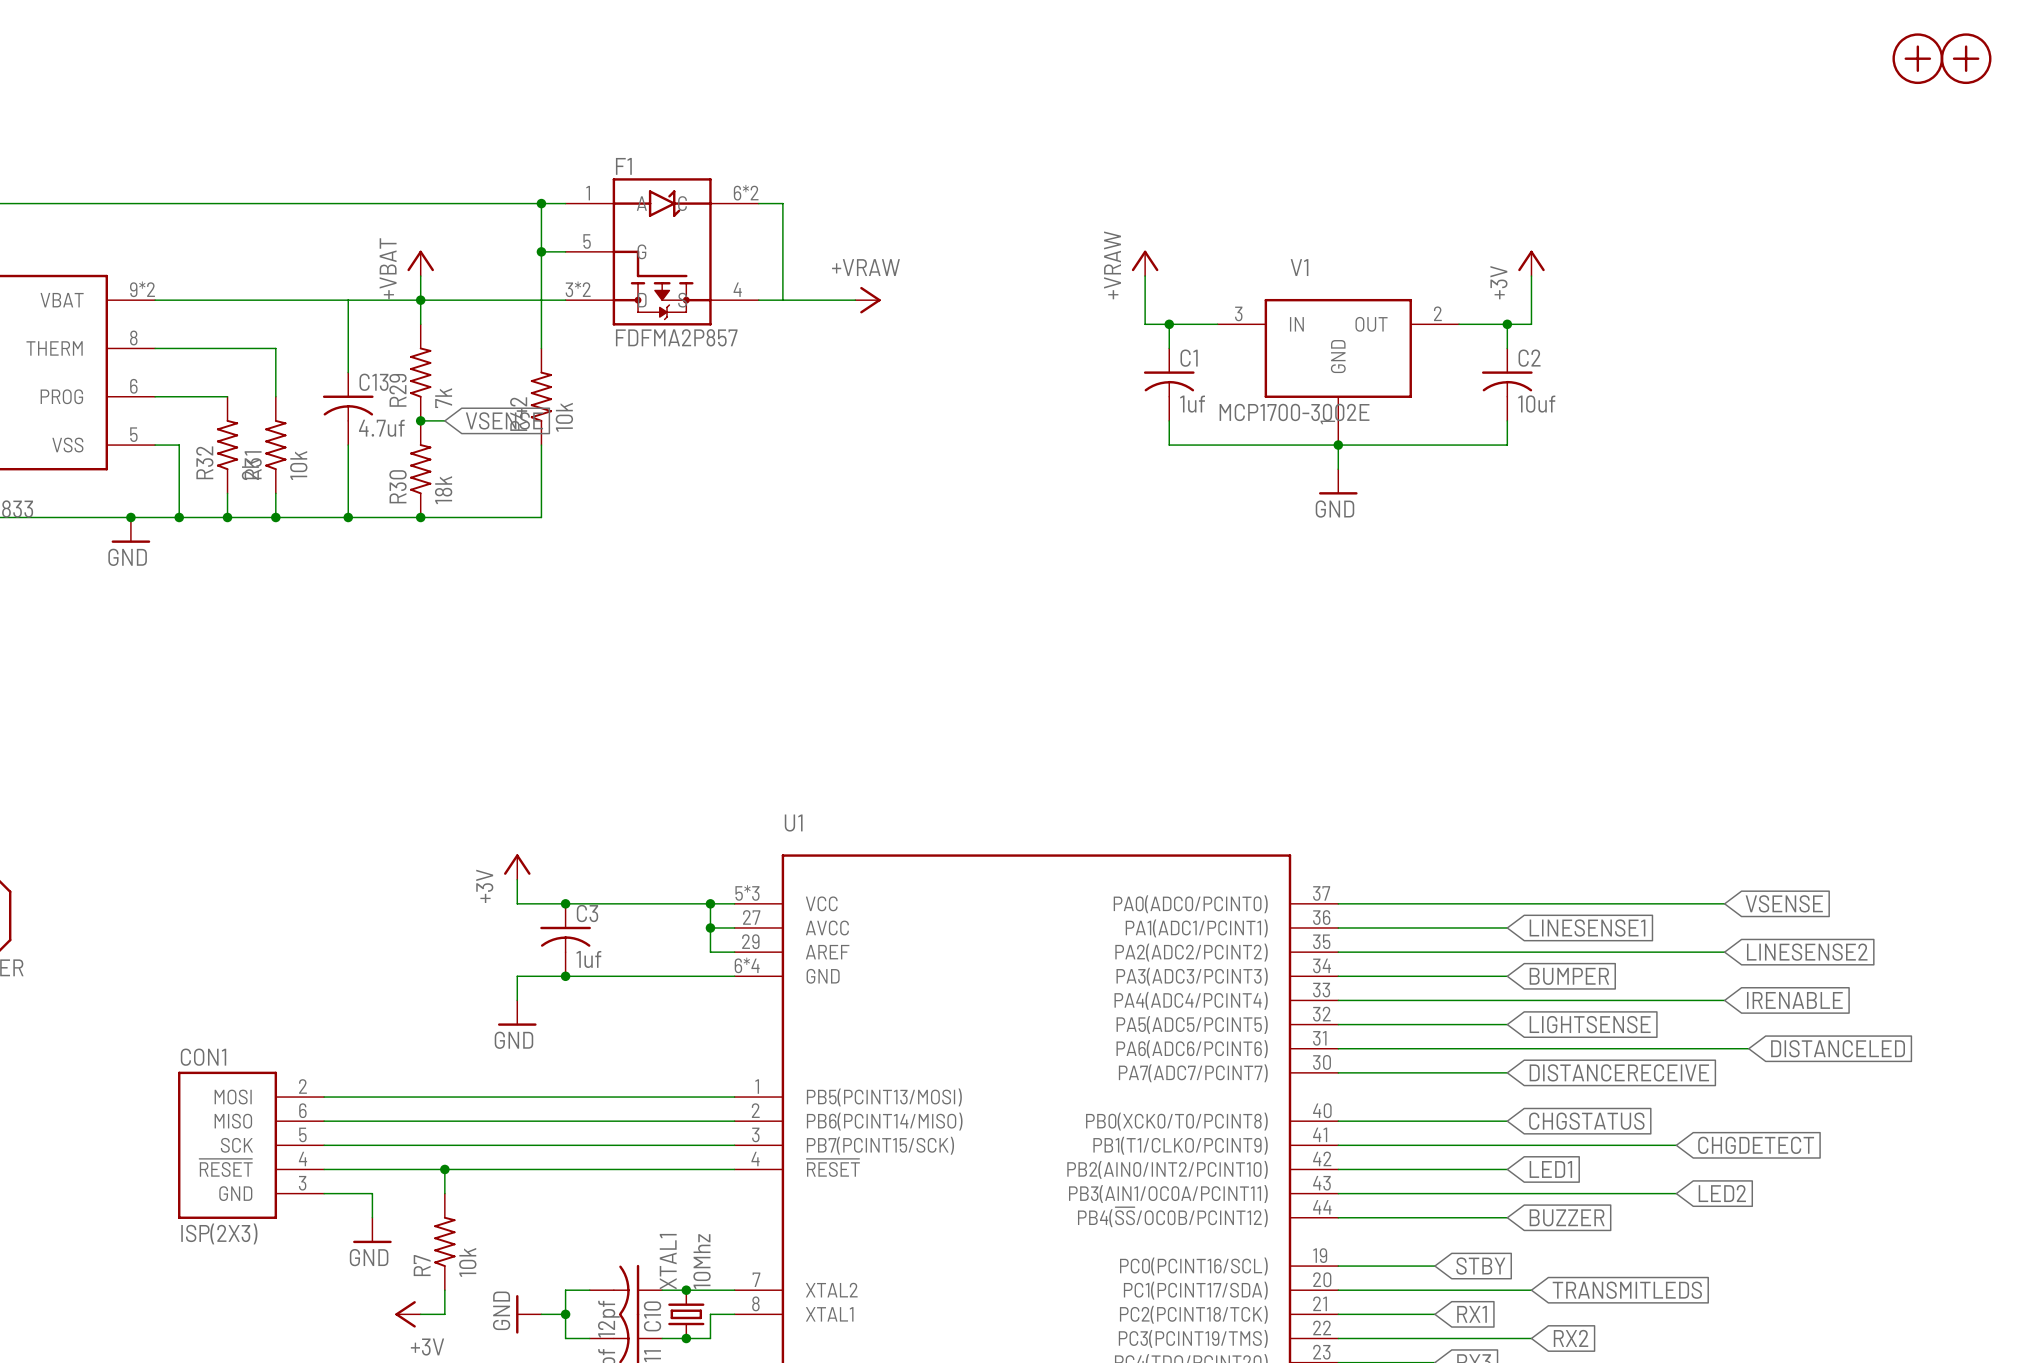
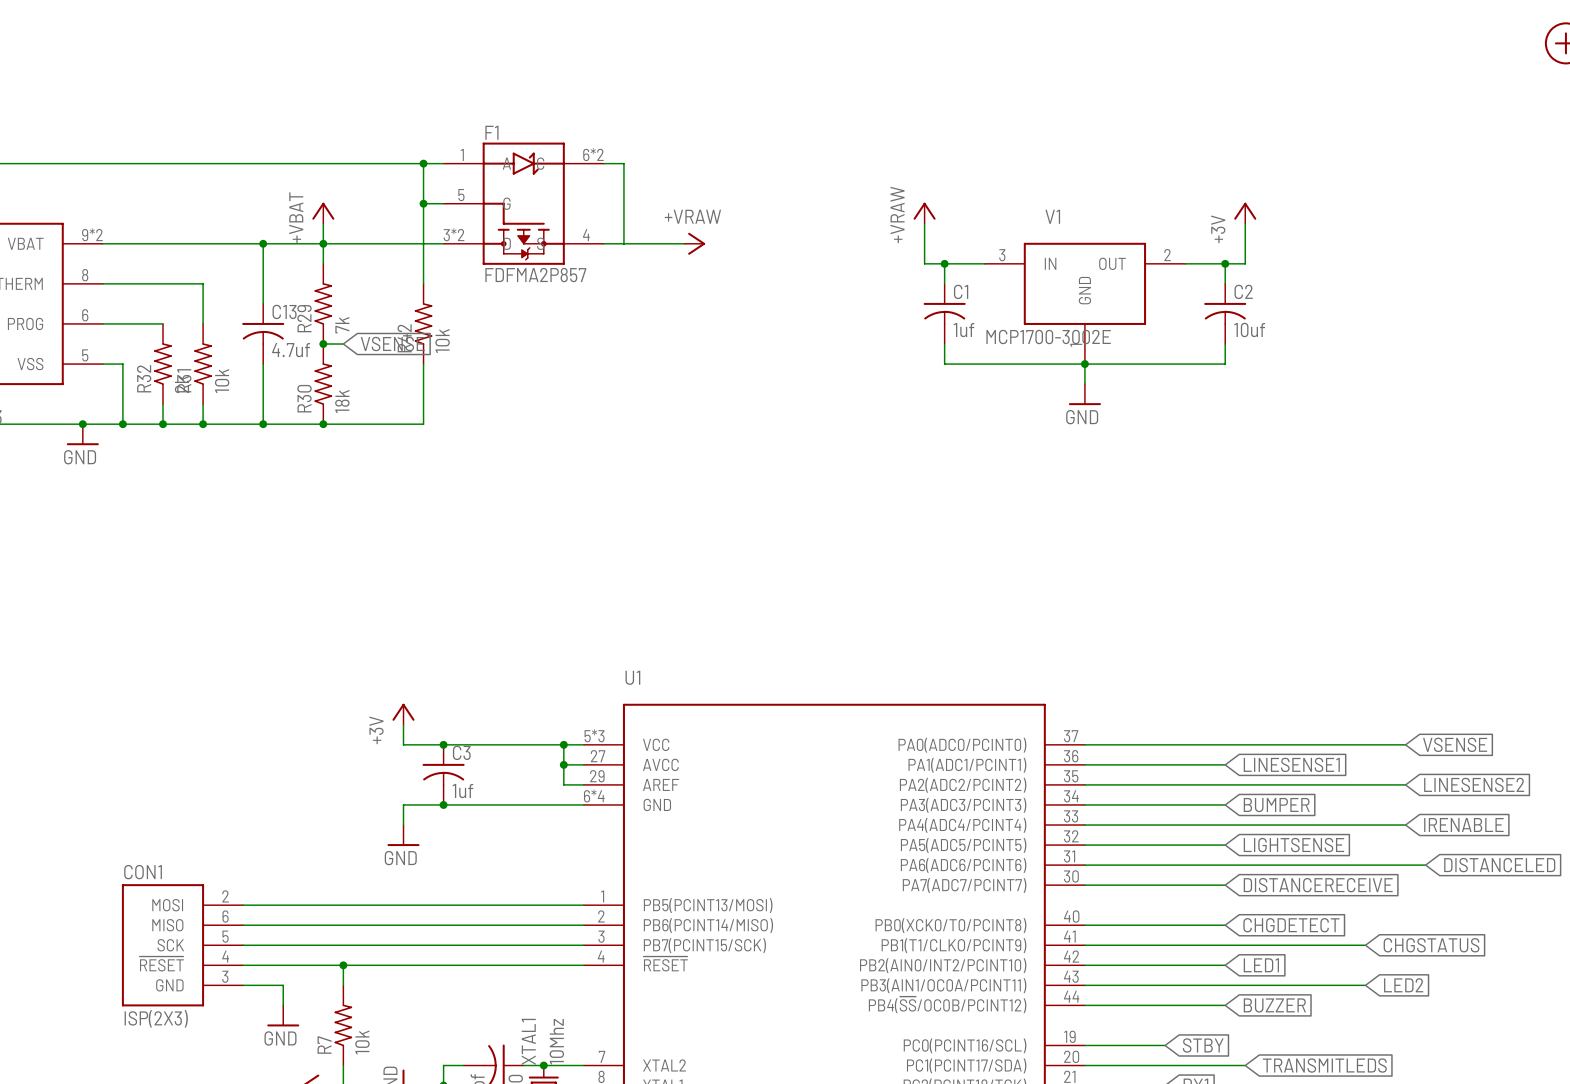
junction: none -> (263, 243)
global label: CHGSTATUS (1586, 1121) -> CHGDETECT (1291, 925)
global label: CHGDETECT (1756, 1145) -> CHGSTATUS (1431, 945)

